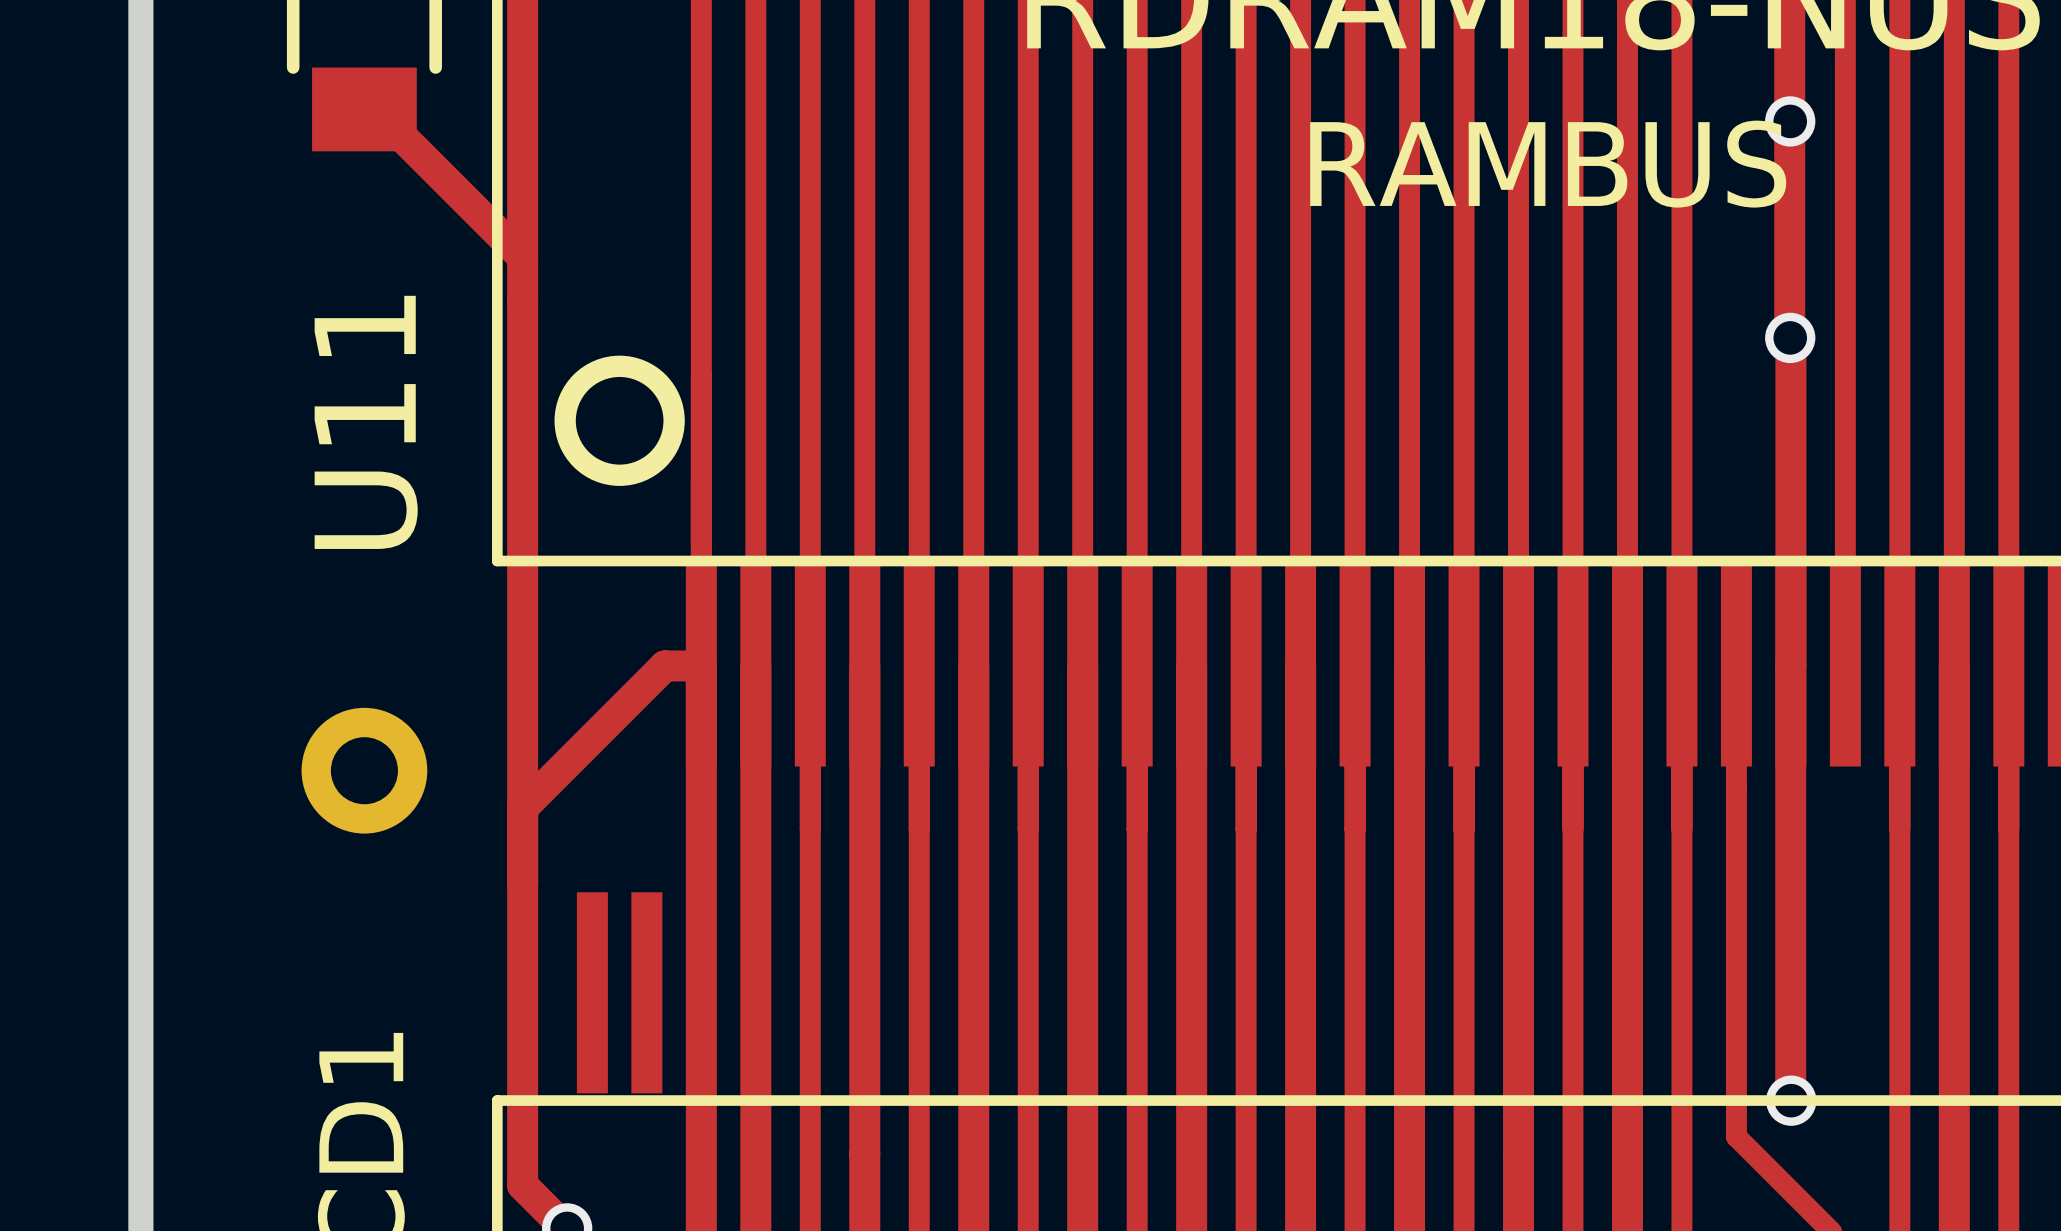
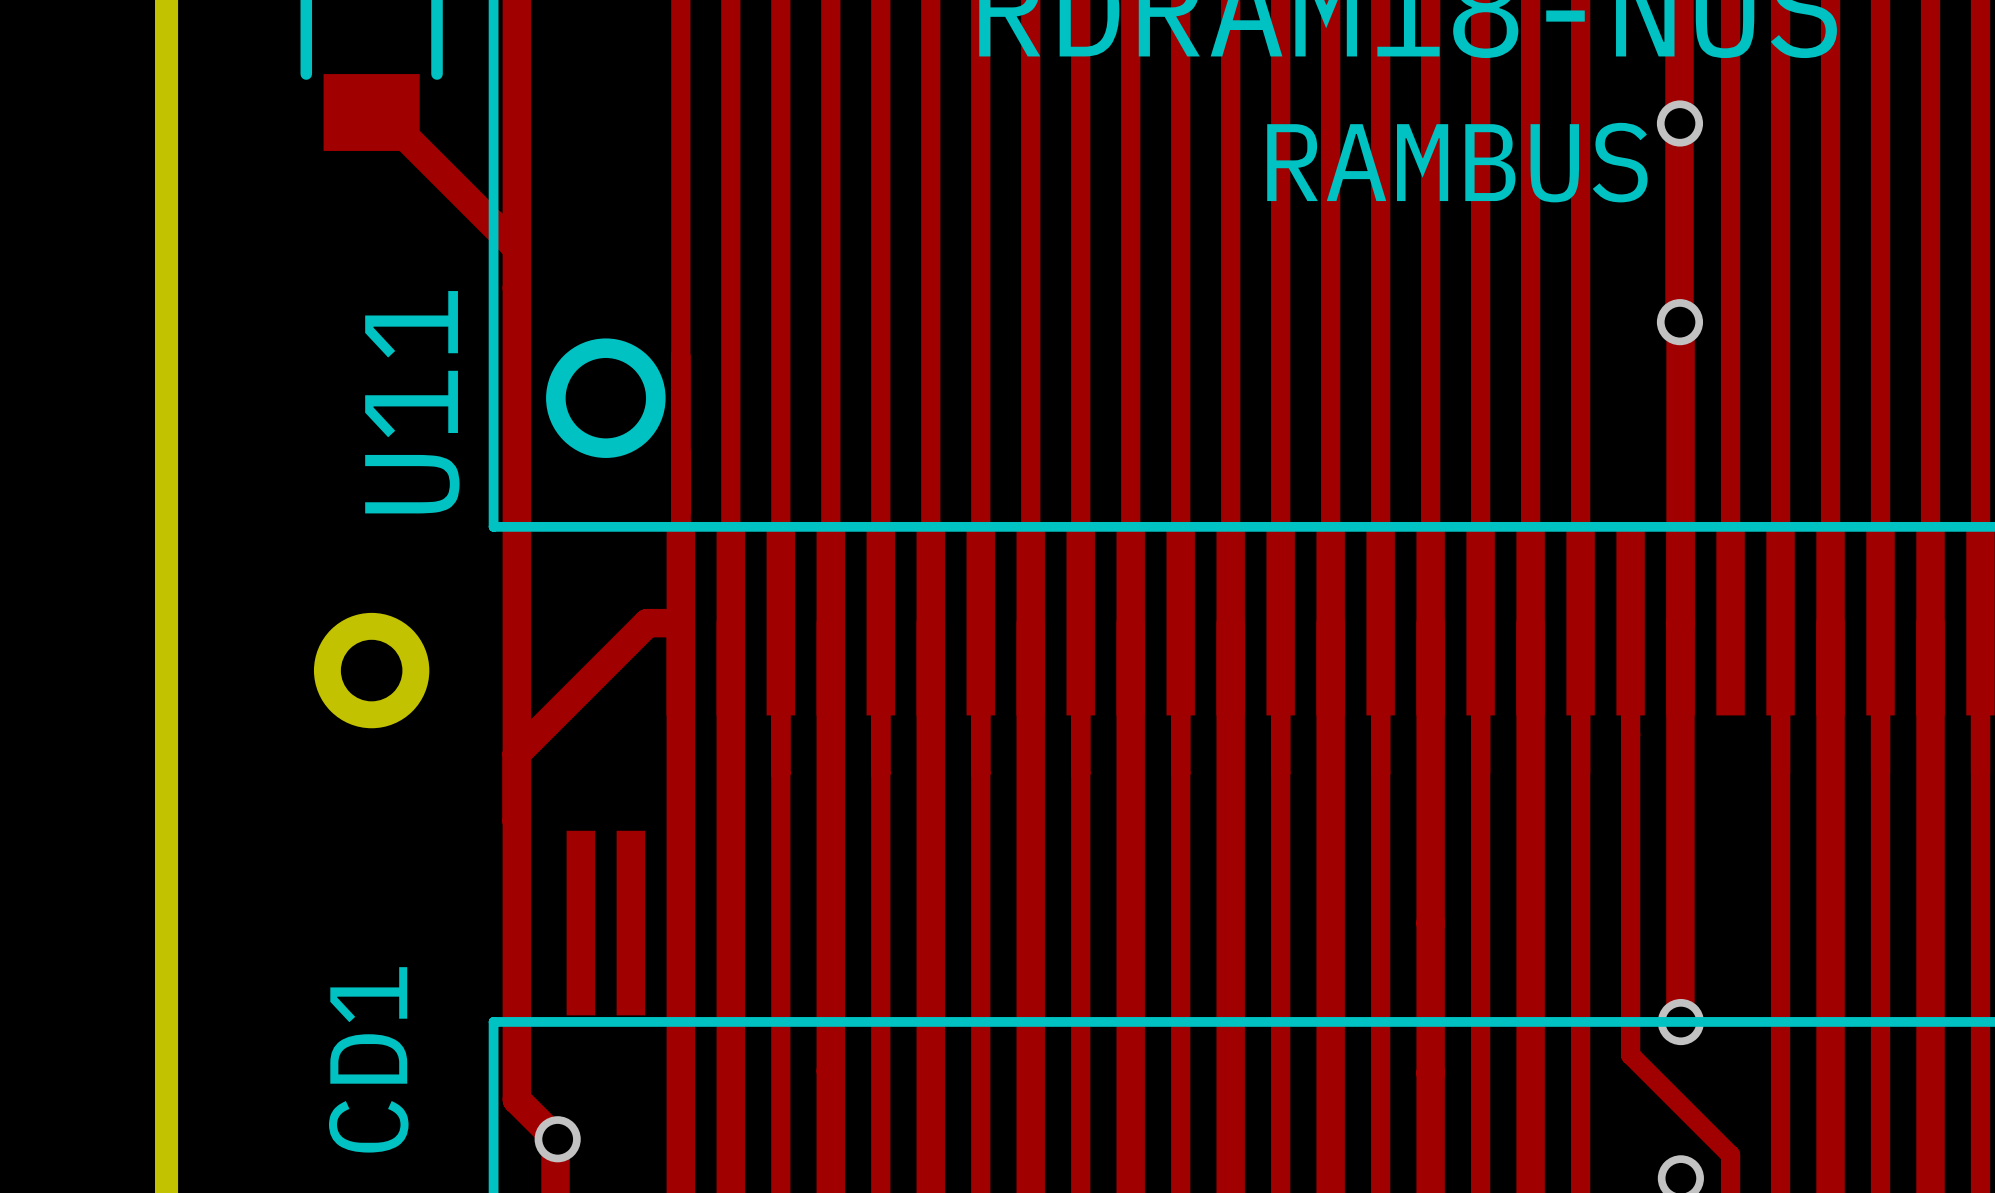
U11 name position: U11 (366, 422) -> U11 (412, 402)
part position: (364, 770) -> (371, 670)

